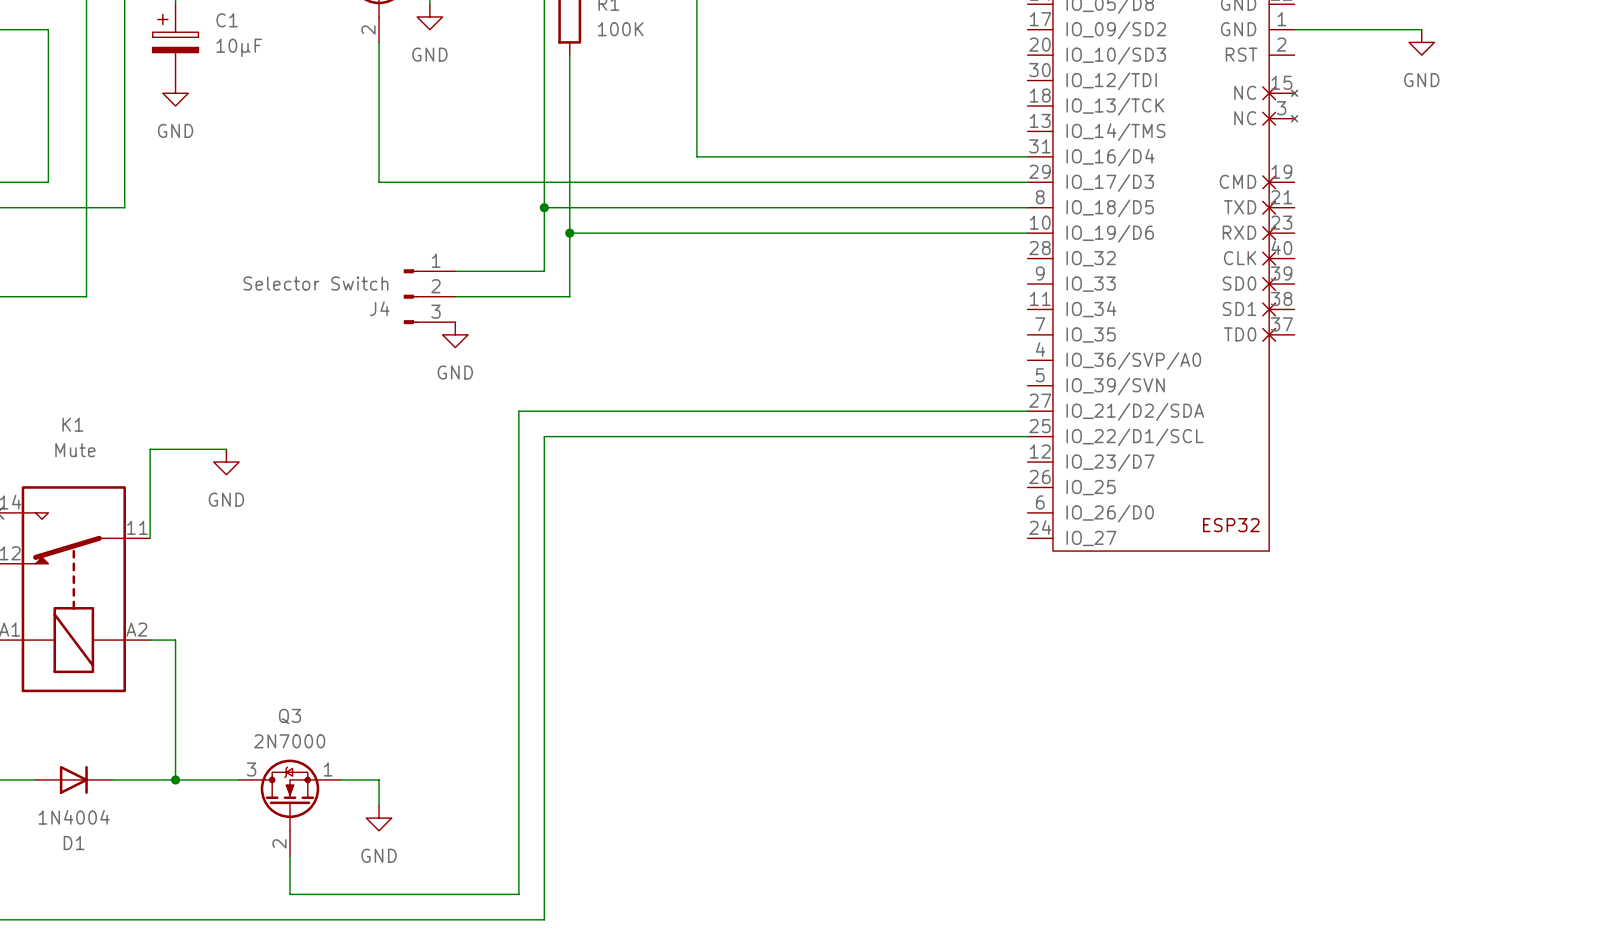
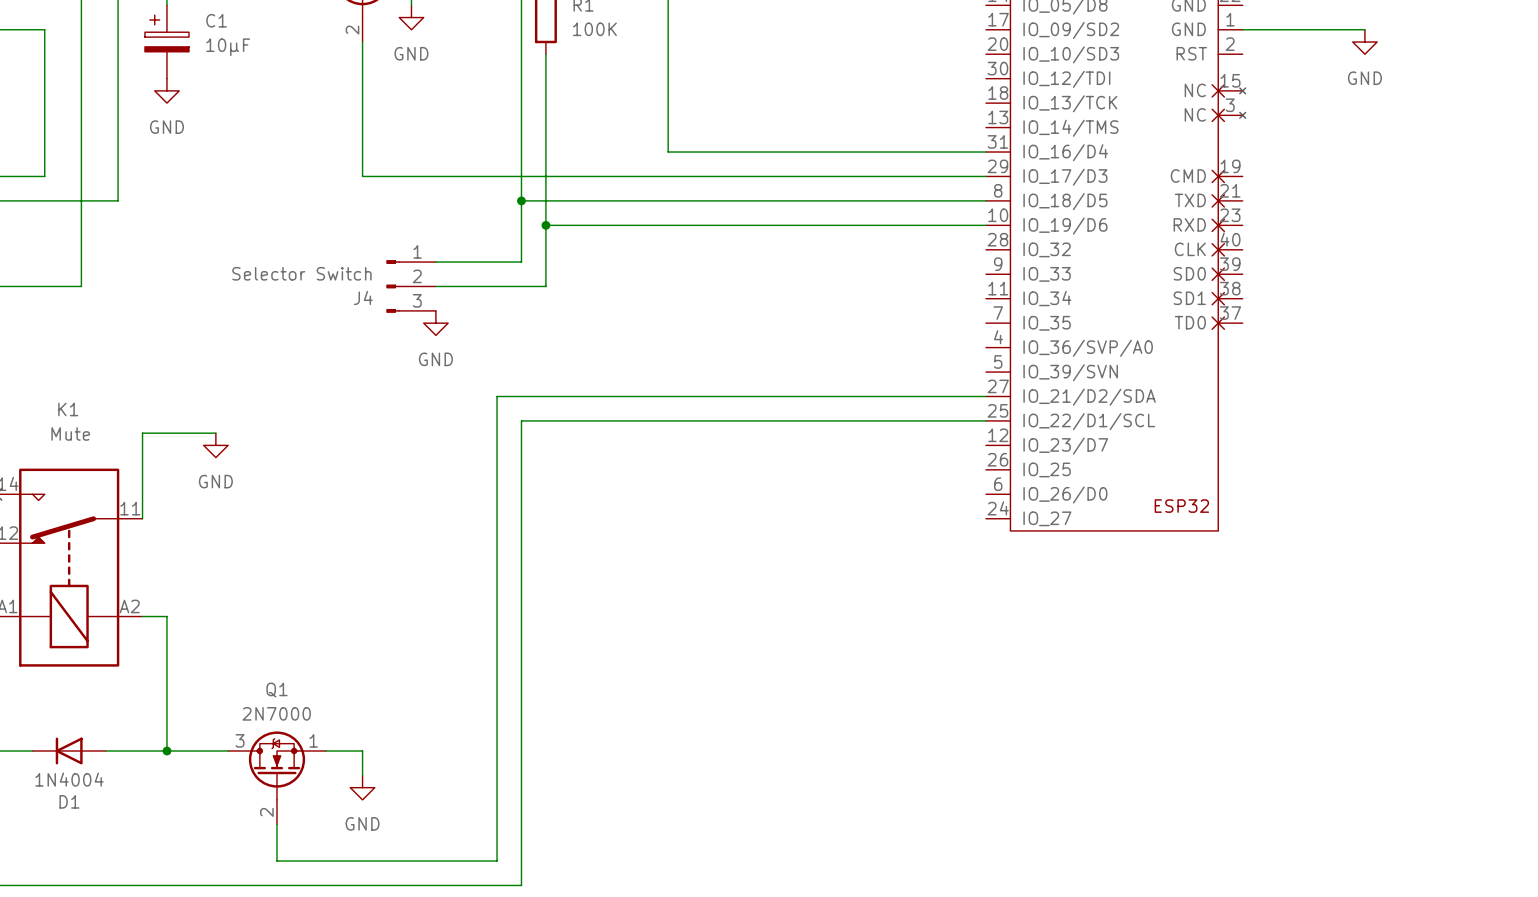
Q3 name: Q3 (290, 716) -> Q1 (276, 690)
D1 rotation: 0° (73, 779) -> 180° (69, 750)

